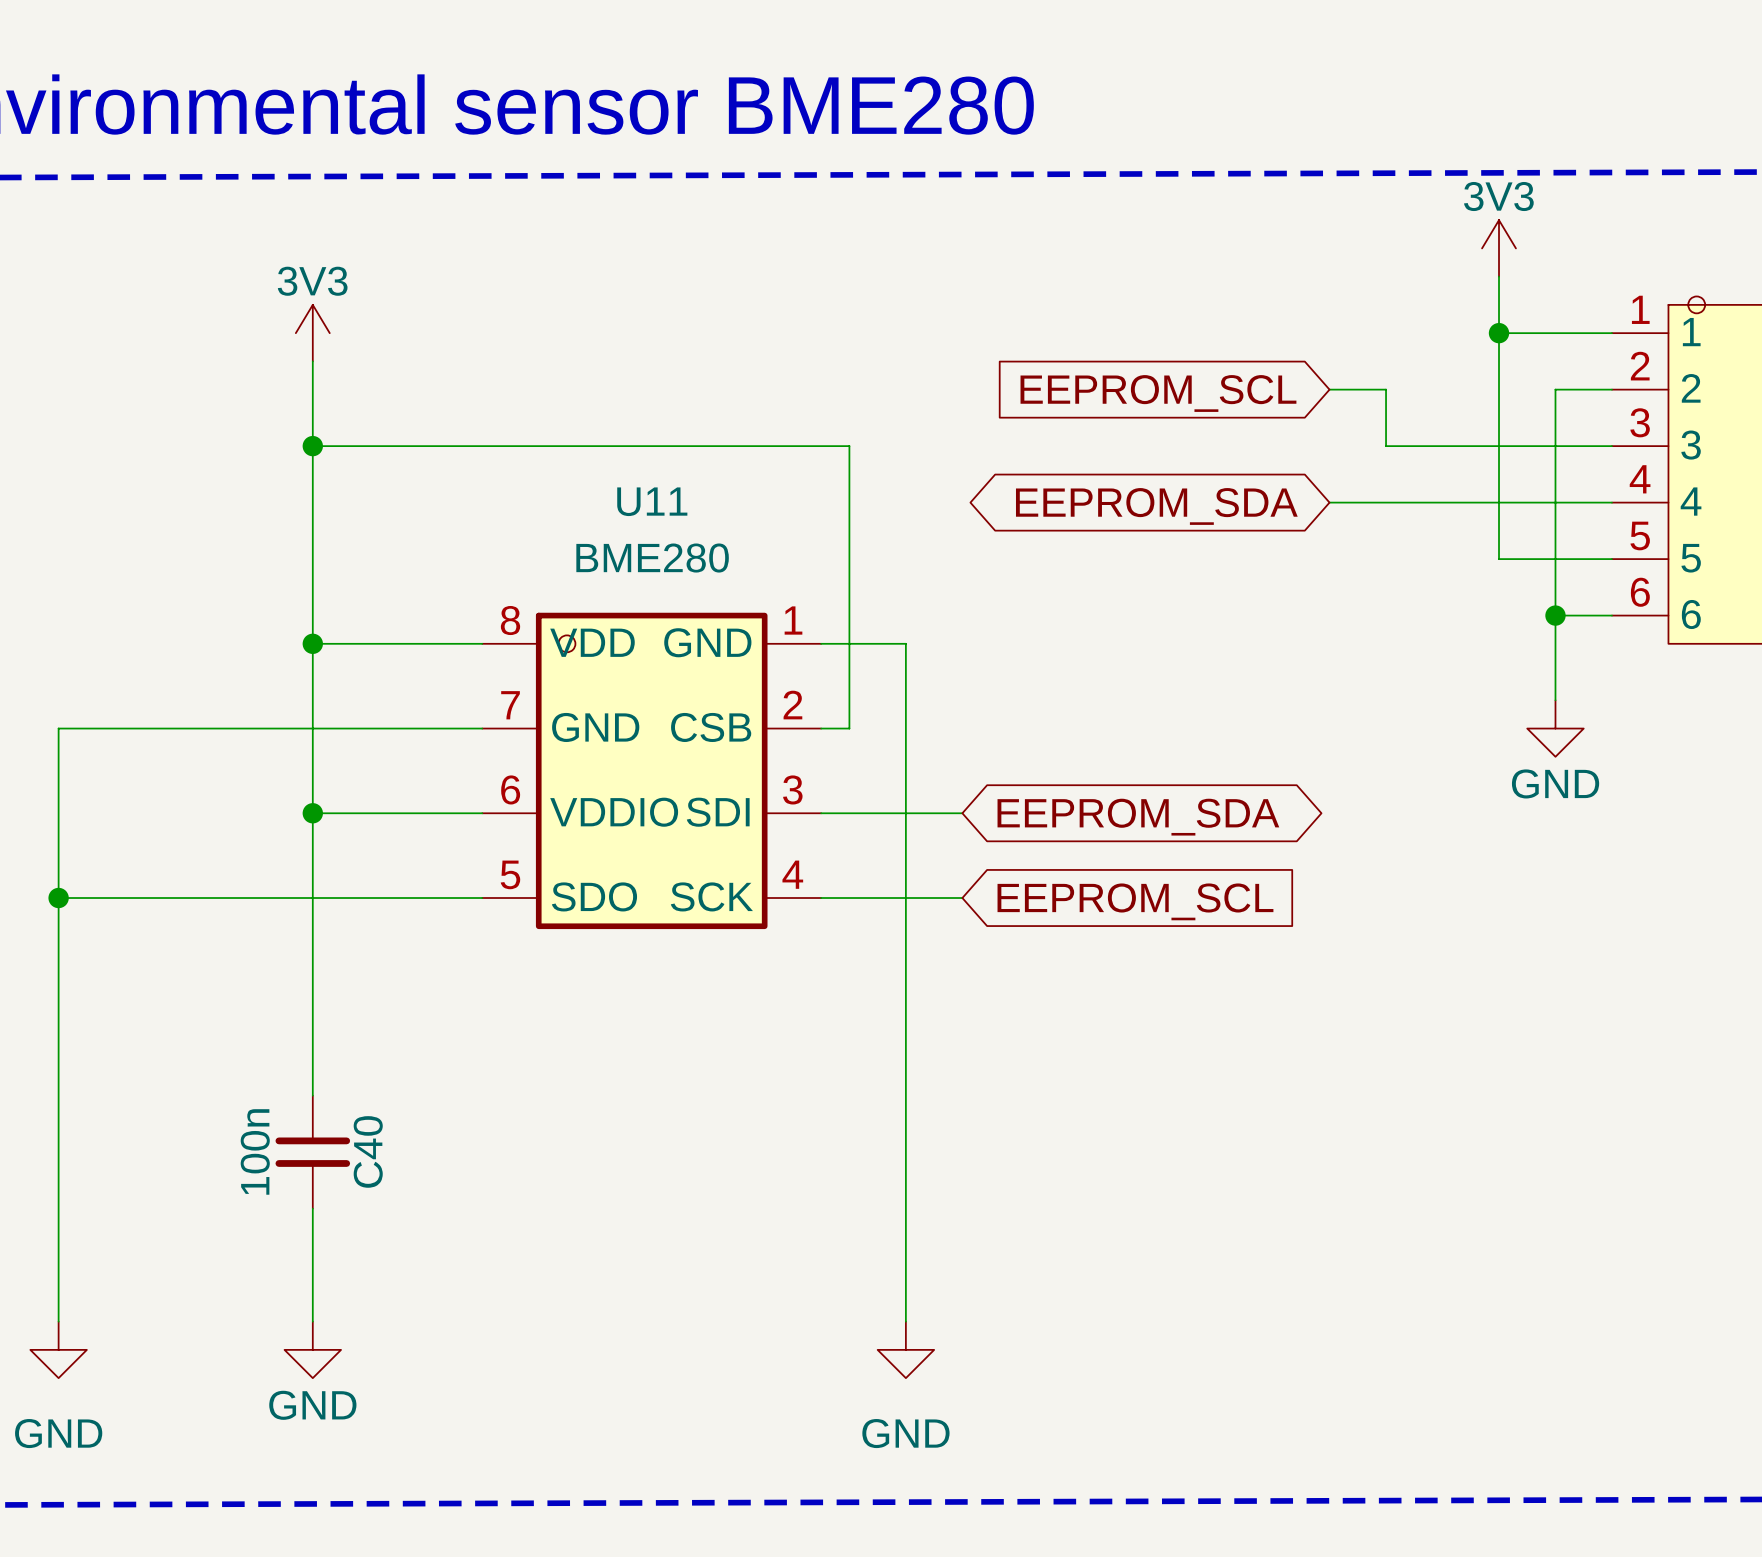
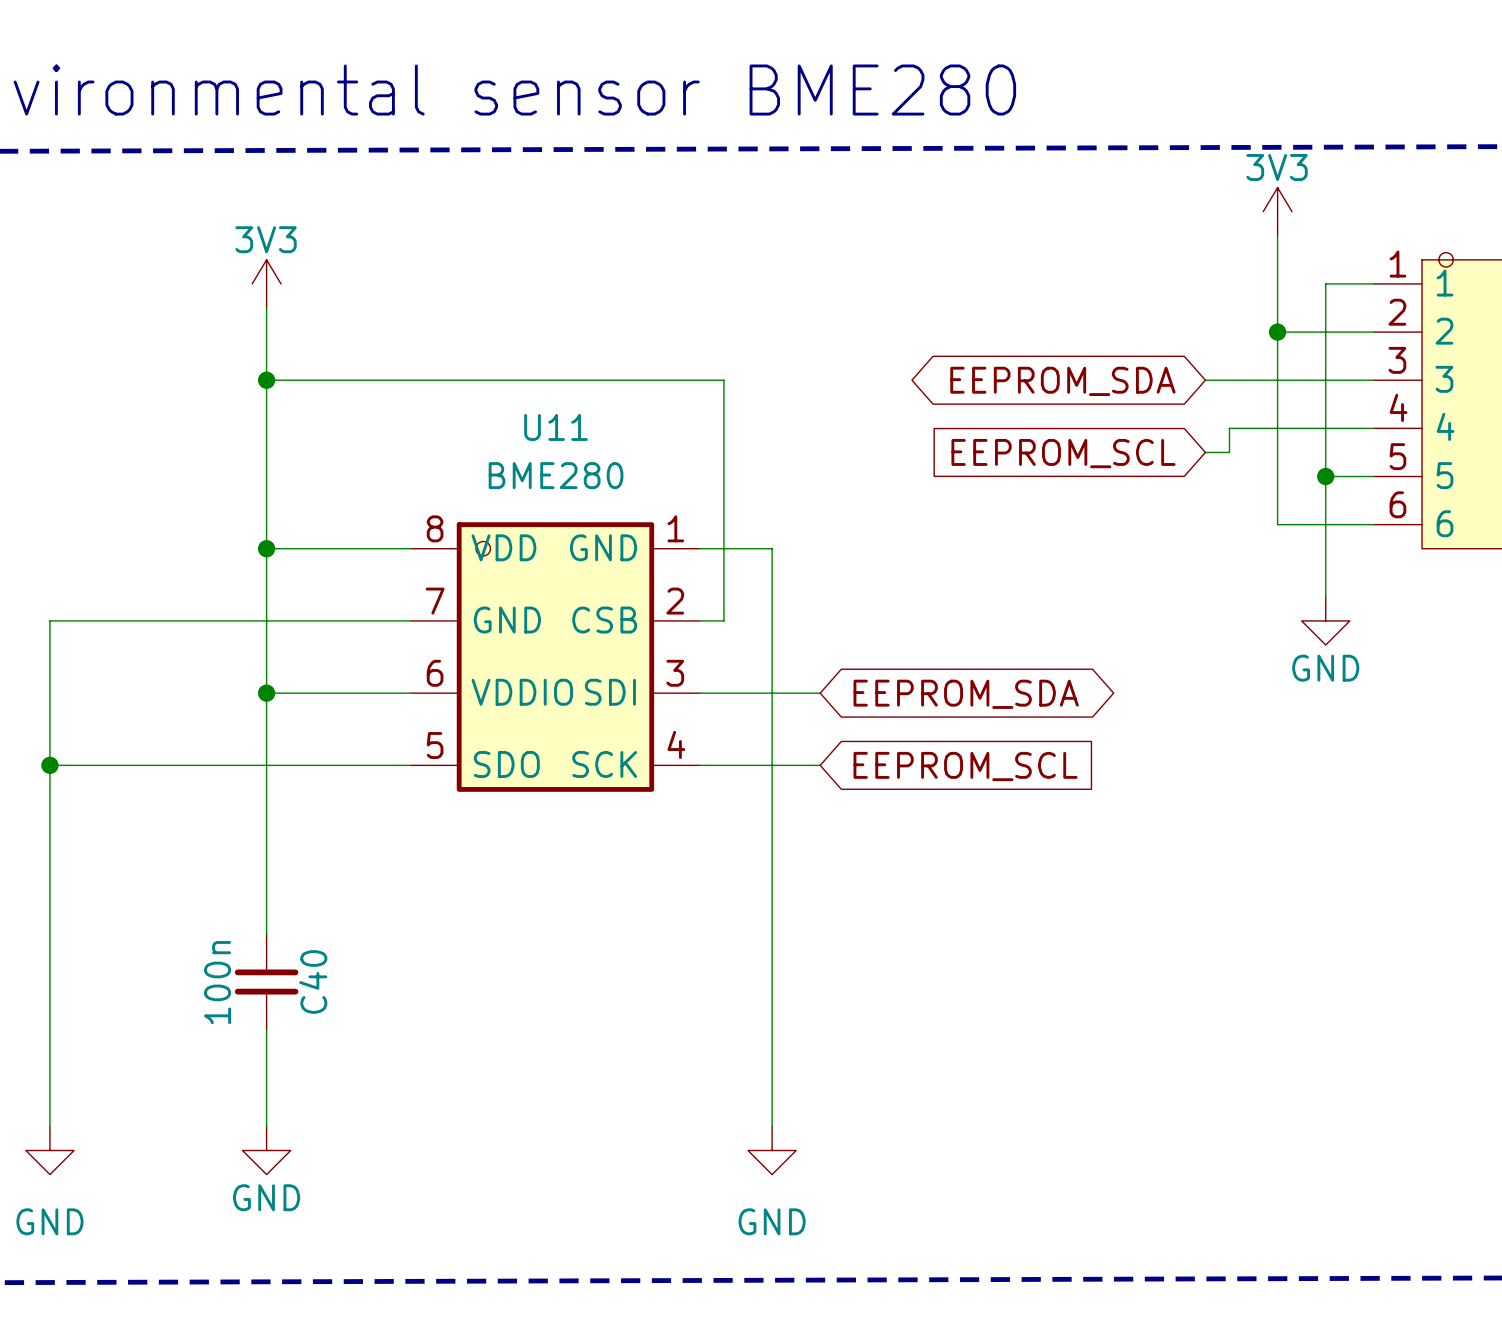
wire: (1499, 333) (1555, 333) -> (1277, 332) (1325, 332) (1325, 283)
junction position: (1499, 333) -> (1277, 332)
wire: (1329, 389) (1386, 389) (1386, 446) (1414, 446) -> none
global label position: EEPROM_SCL (1158, 393) -> EEPROM_SCL (1063, 453)
wire: (1329, 502) (1442, 502) -> (1205, 452) (1229, 452) (1229, 428)
global label position: EEPROM_SDA (1156, 506) -> EEPROM_SDA (1062, 381)
wire: (1499, 559) (1555, 559) -> (1277, 476) (1277, 524) (1325, 524)
junction position: (1555, 615) -> (1325, 476)

